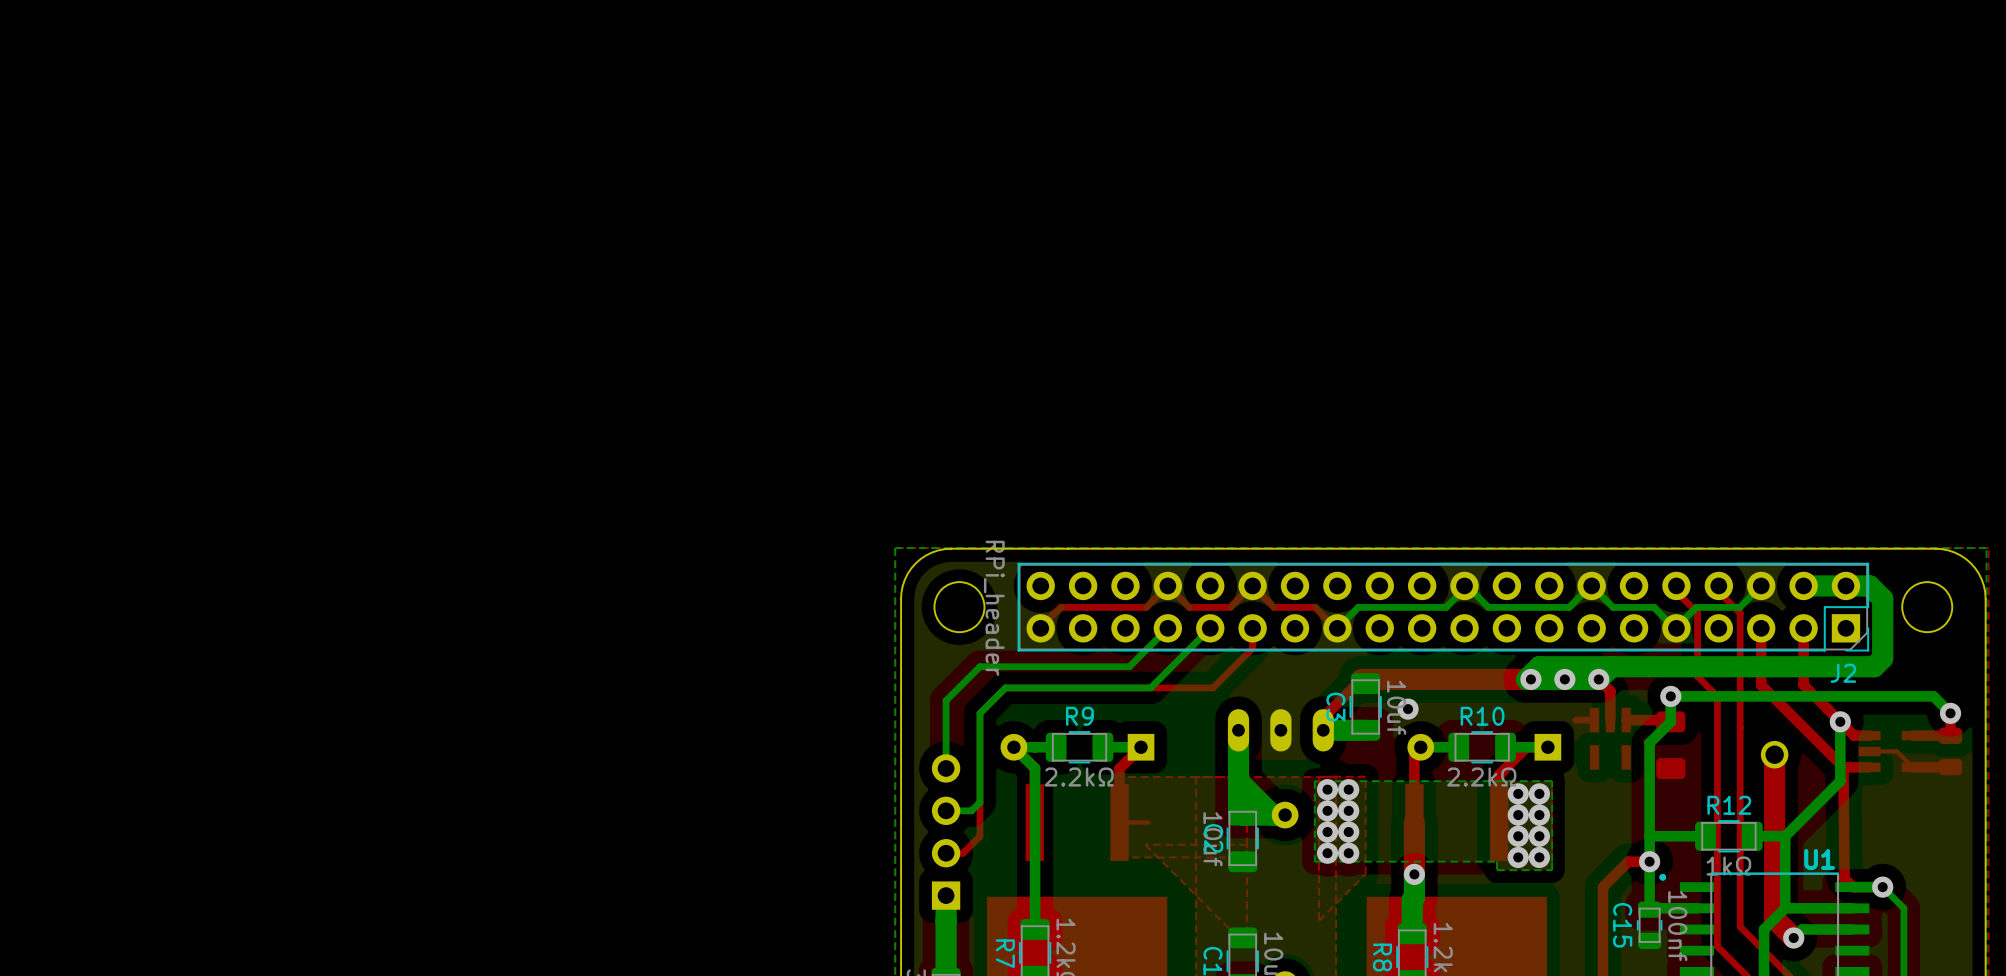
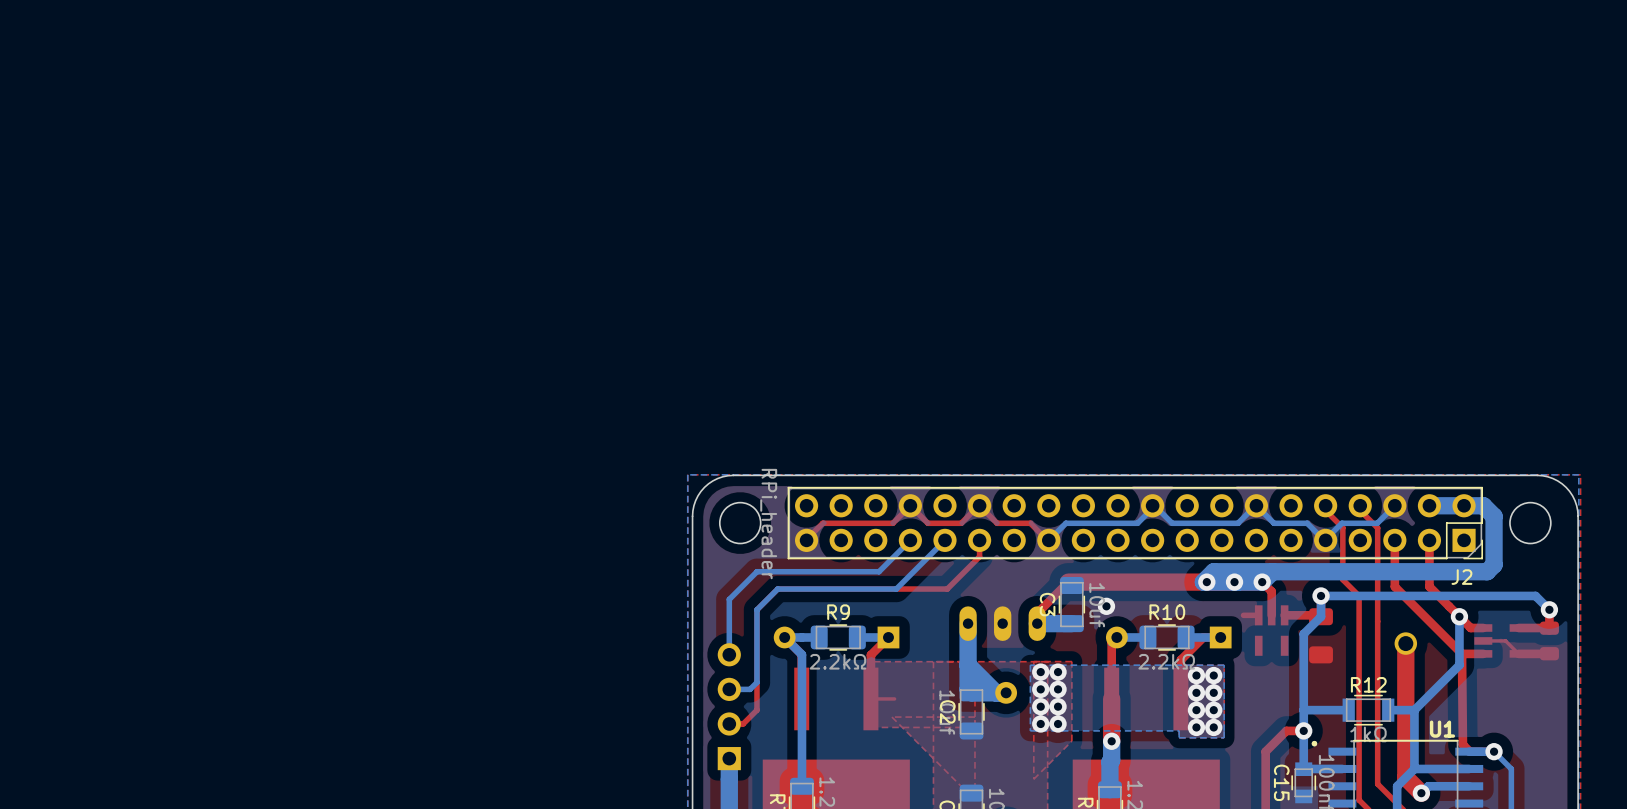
R12 footprint: [1695, 820, 1763, 853] -> [1342, 694, 1395, 726]
C15 footprint: [1636, 901, 1663, 950] -> [1291, 762, 1317, 804]

